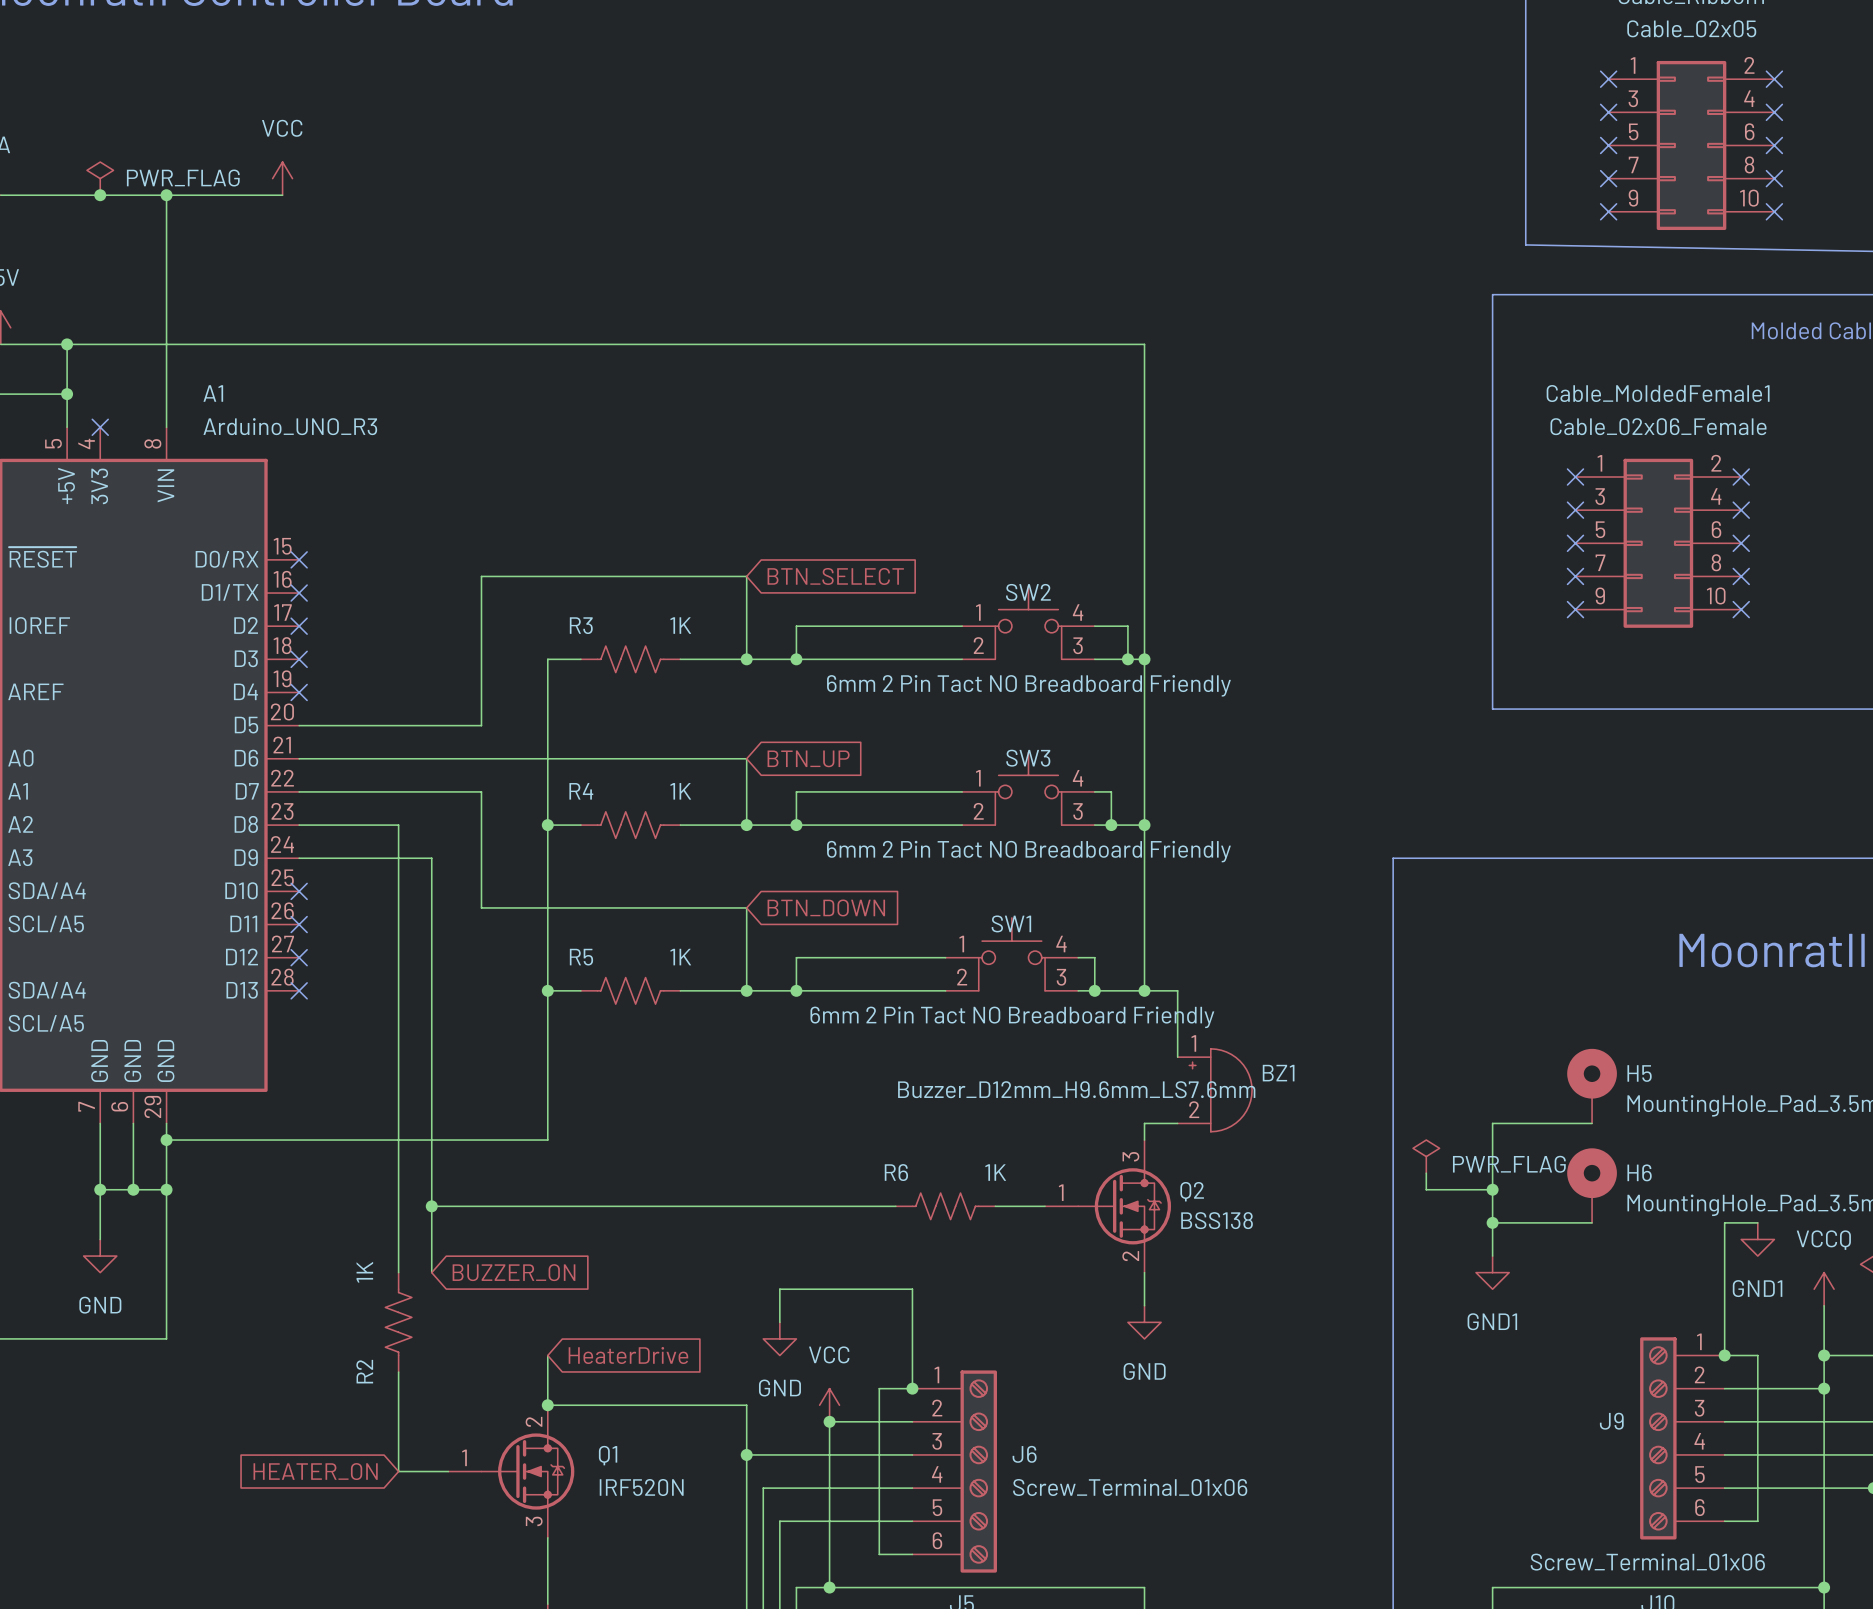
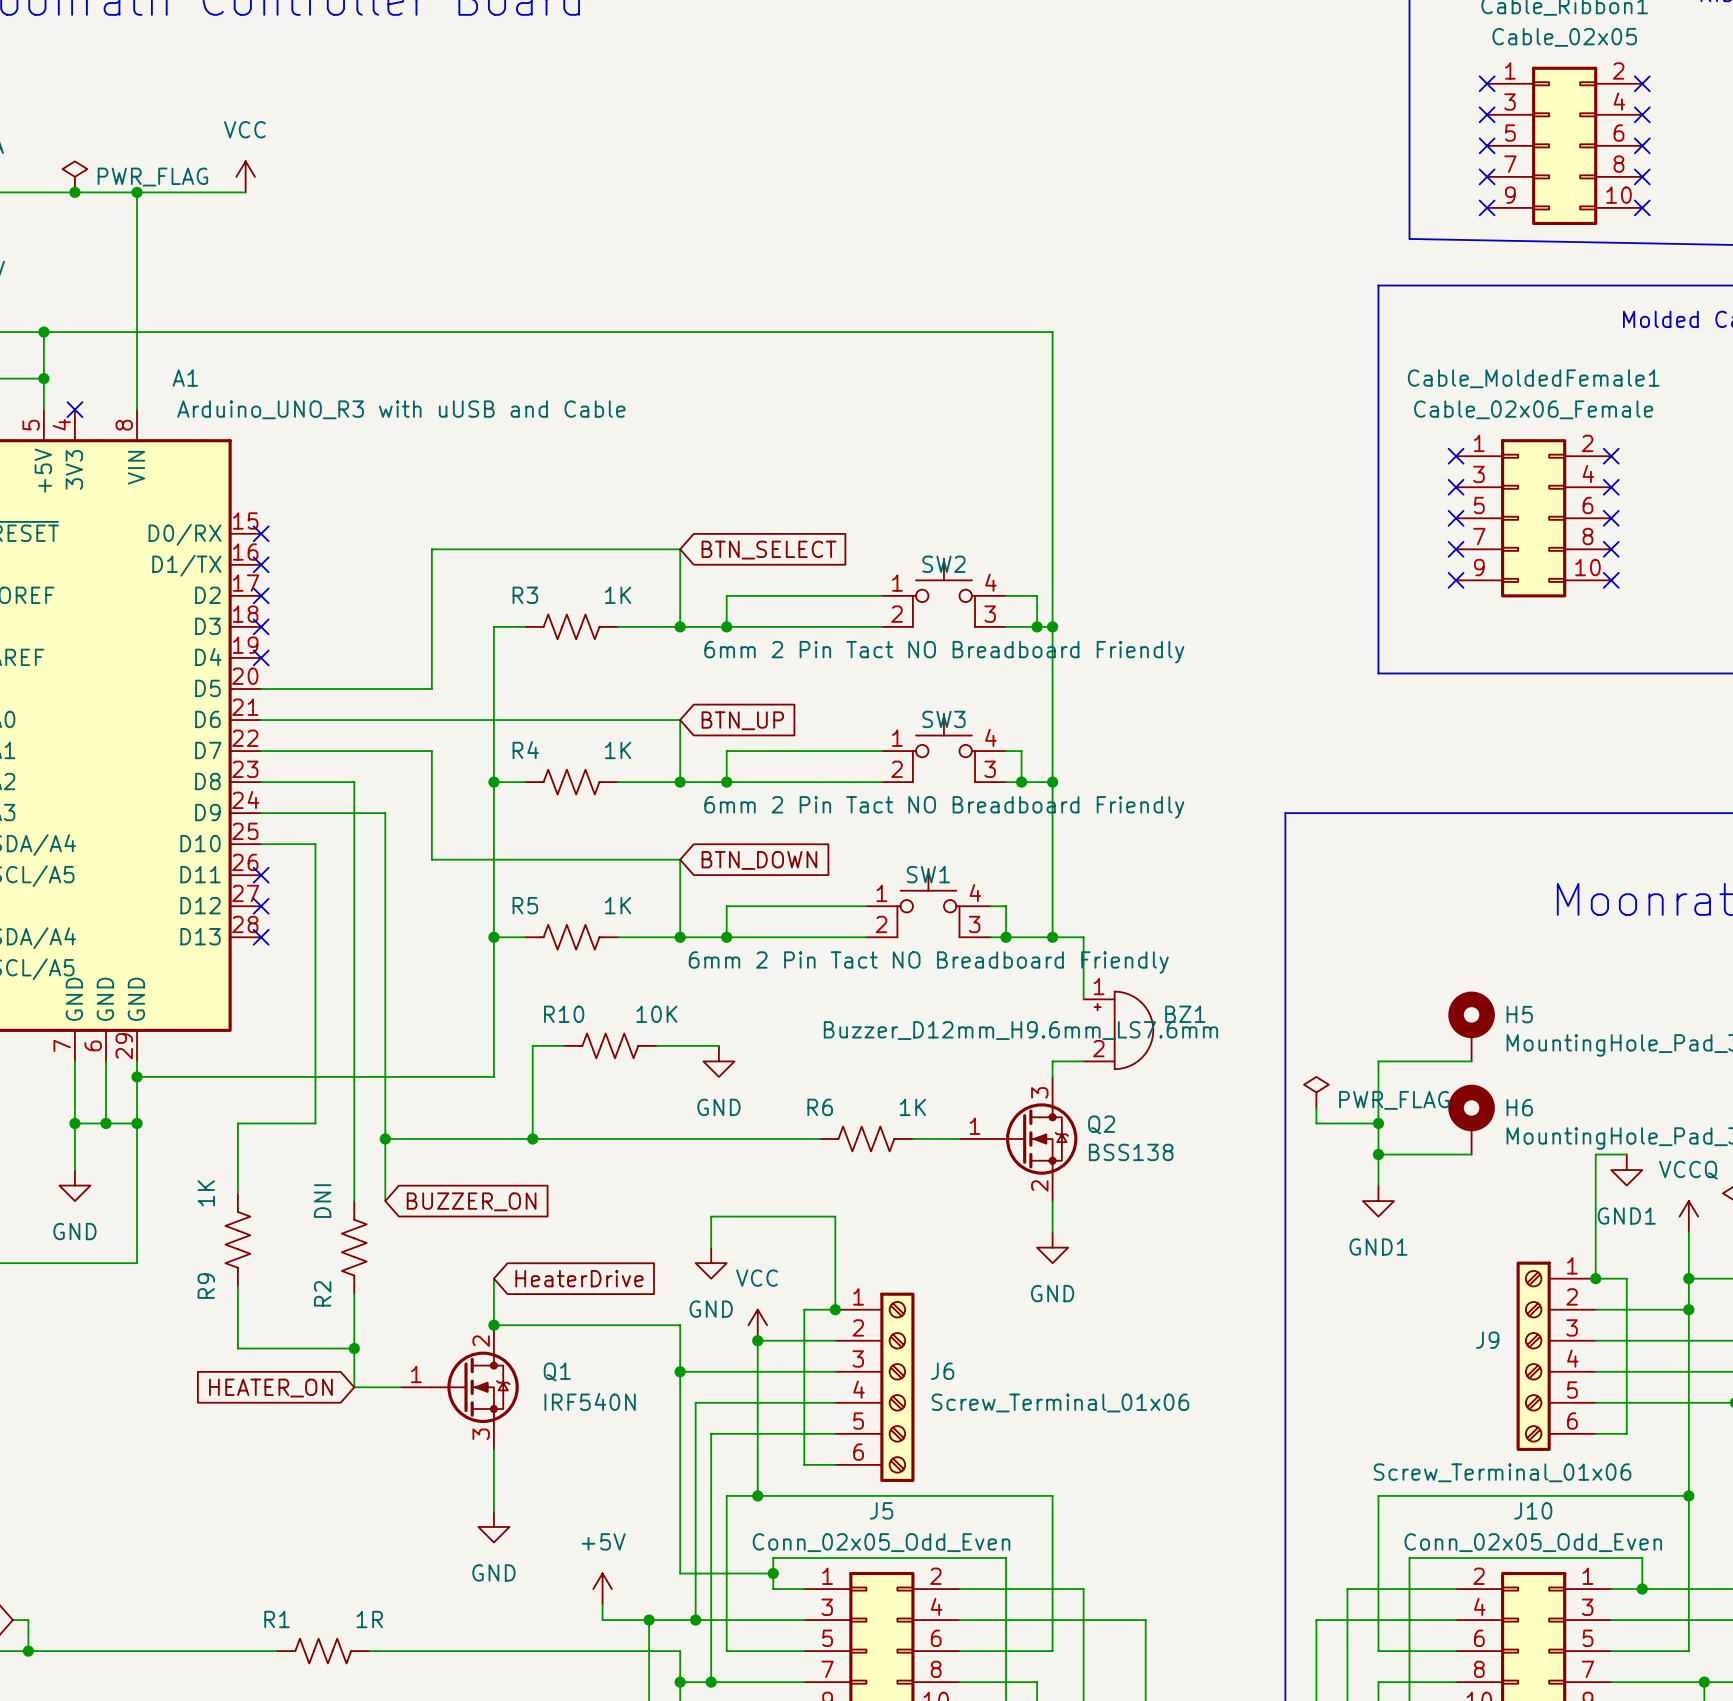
A1 value: Arduino_UNO_R3 (290, 426) -> Arduino_UNO_R3 with uUSB and Cable (401, 409)
wire: none -> (261, 844) (315, 844) (315, 1123) (237, 1123) (237, 1193)
no-connect mark: (299, 891) -> none
wire: none -> (563, 1045) (532, 1045) (532, 1139)
R10: none -> 10K (610, 1045)
wire: none -> (656, 1045) (718, 1045)
power symbol: none -> GND (718, 1061)
junction: none -> (532, 1139)
R2 value: 1K (364, 1272) -> DNI (322, 1201)
R9: none -> 1K (237, 1239)
wire: none -> (237, 1286) (237, 1348) (354, 1348)
junction: none -> (354, 1348)
Q1 value: IRF520N (641, 1487) -> IRF540N (590, 1401)

